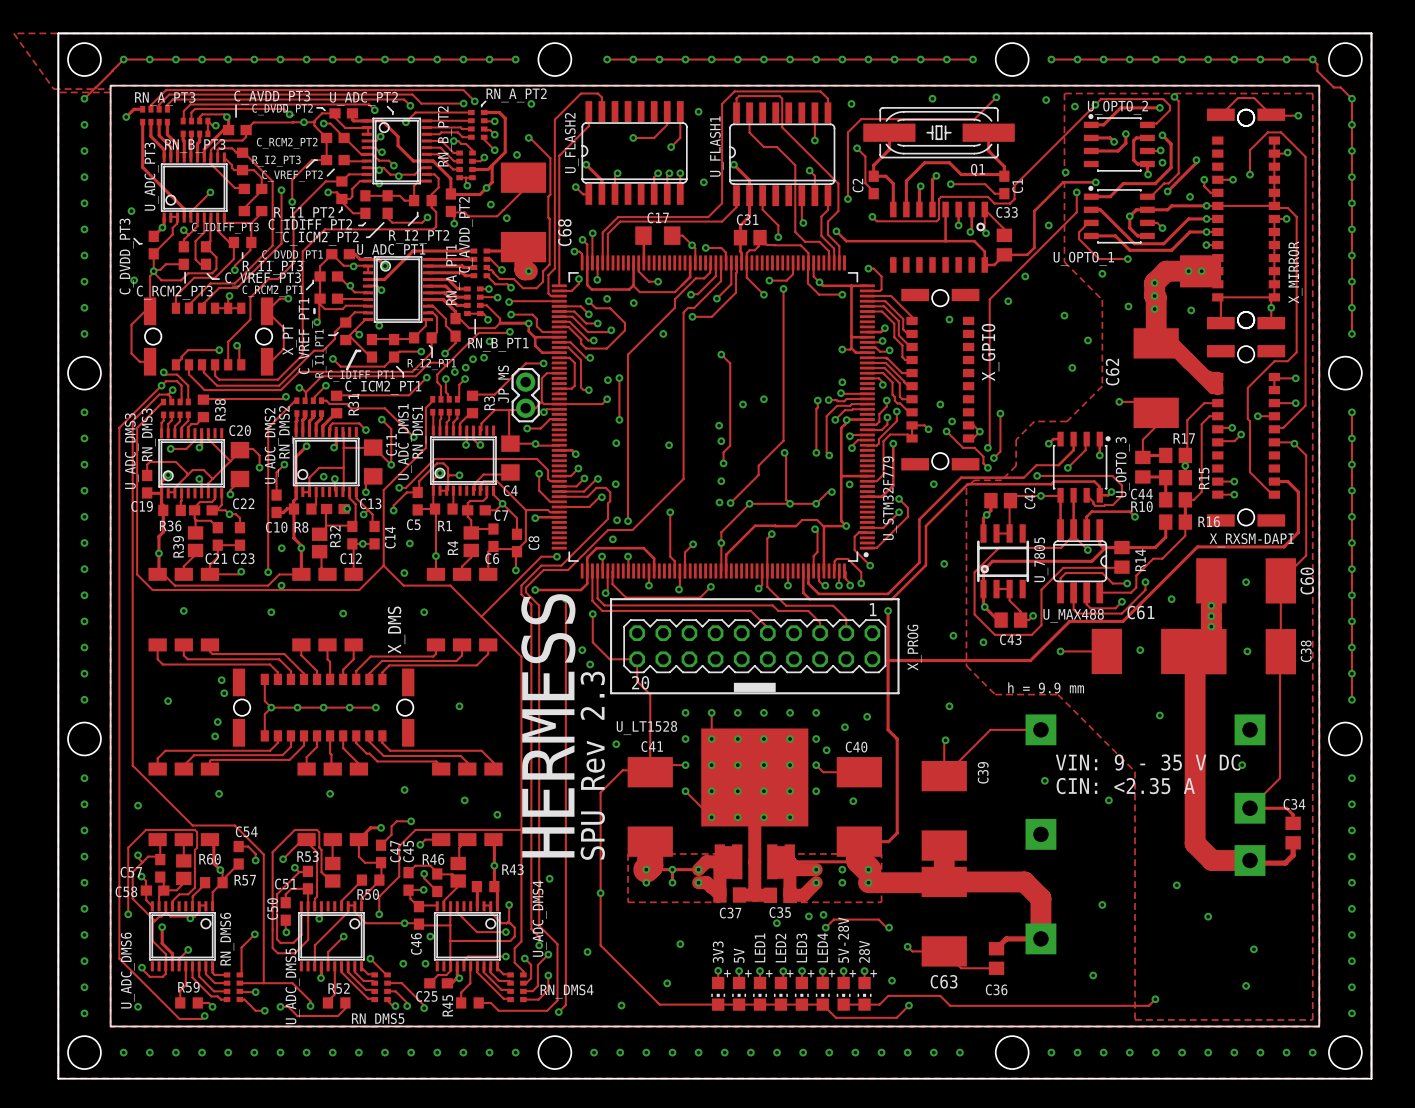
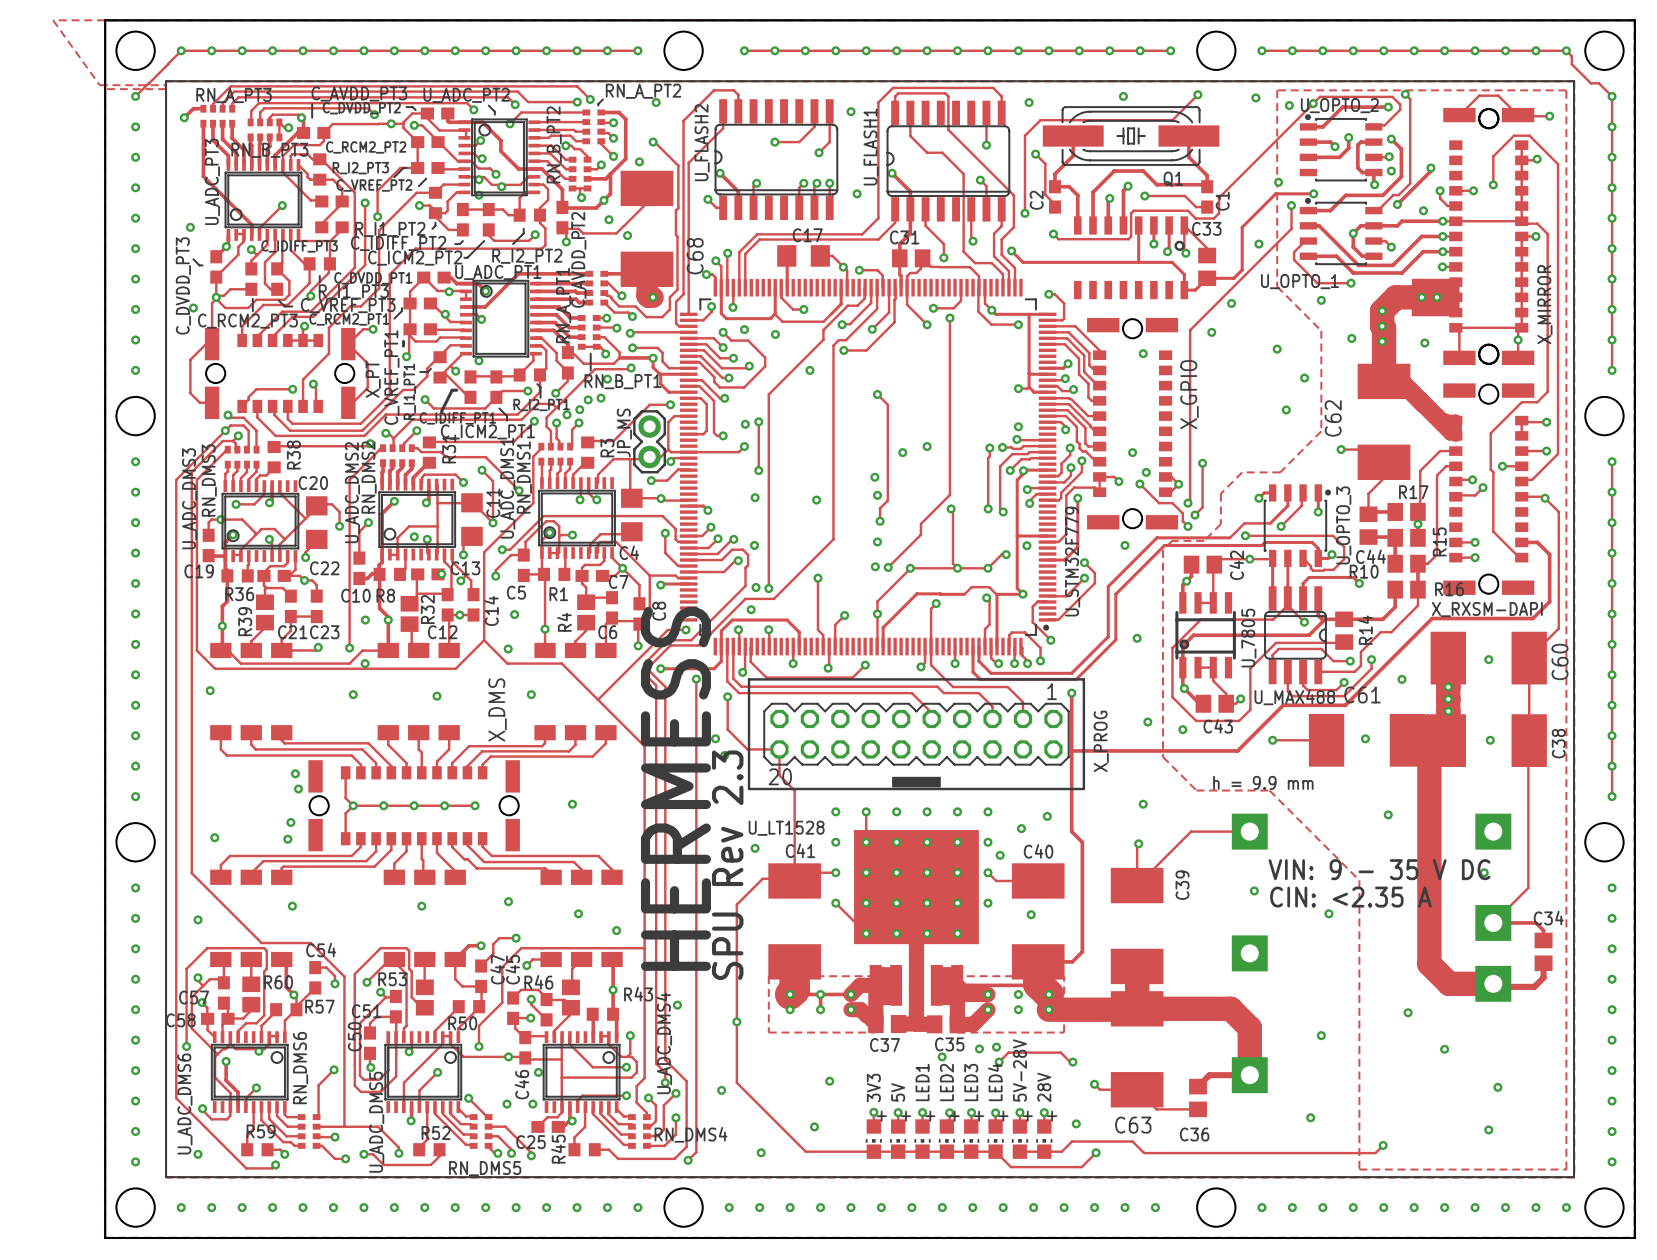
via: none -> (220, 519)
via position: (183, 610) -> (210, 690)
via position: (168, 701) -> (214, 837)

